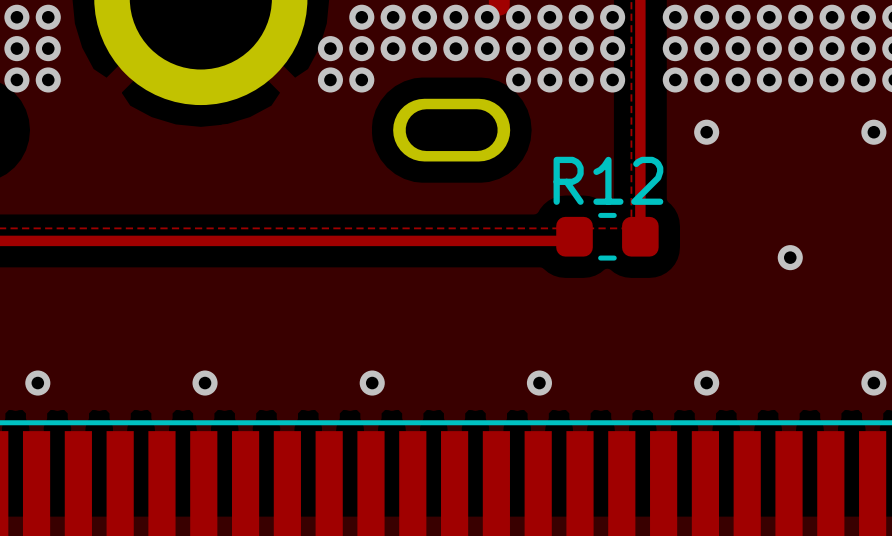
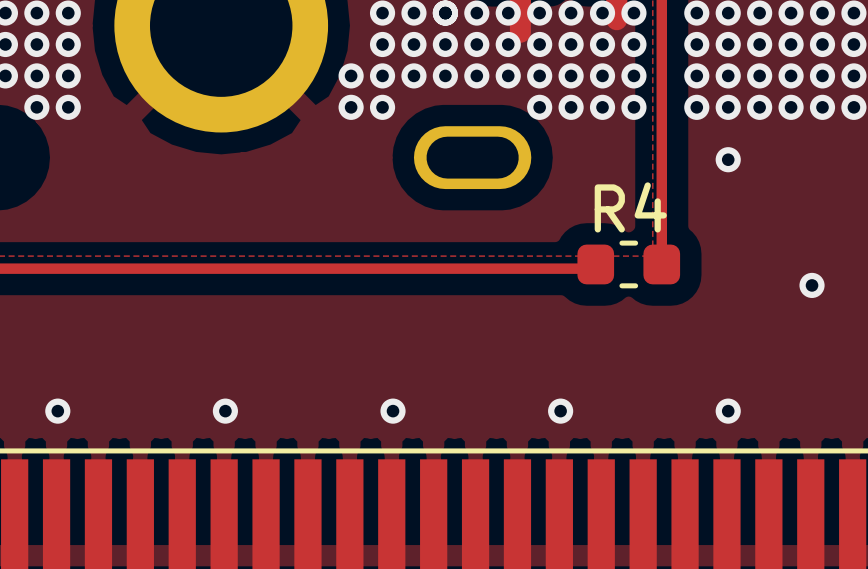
R12 name: R12 (608, 180) -> R4 (630, 207)

